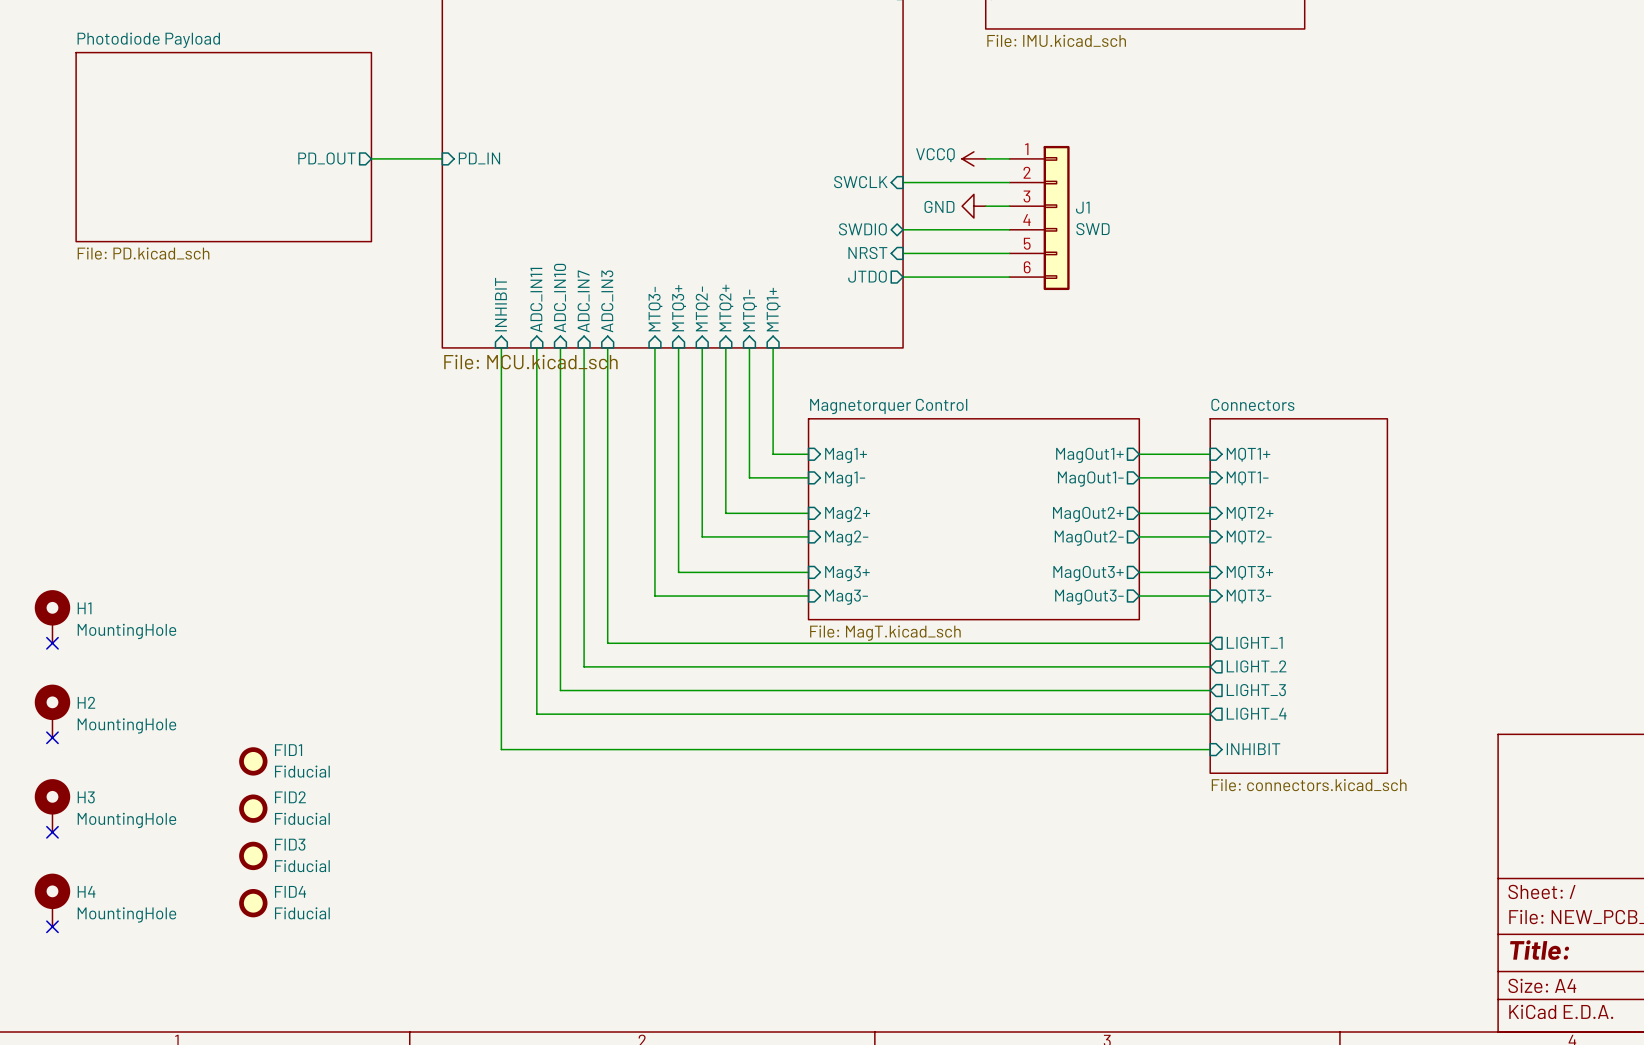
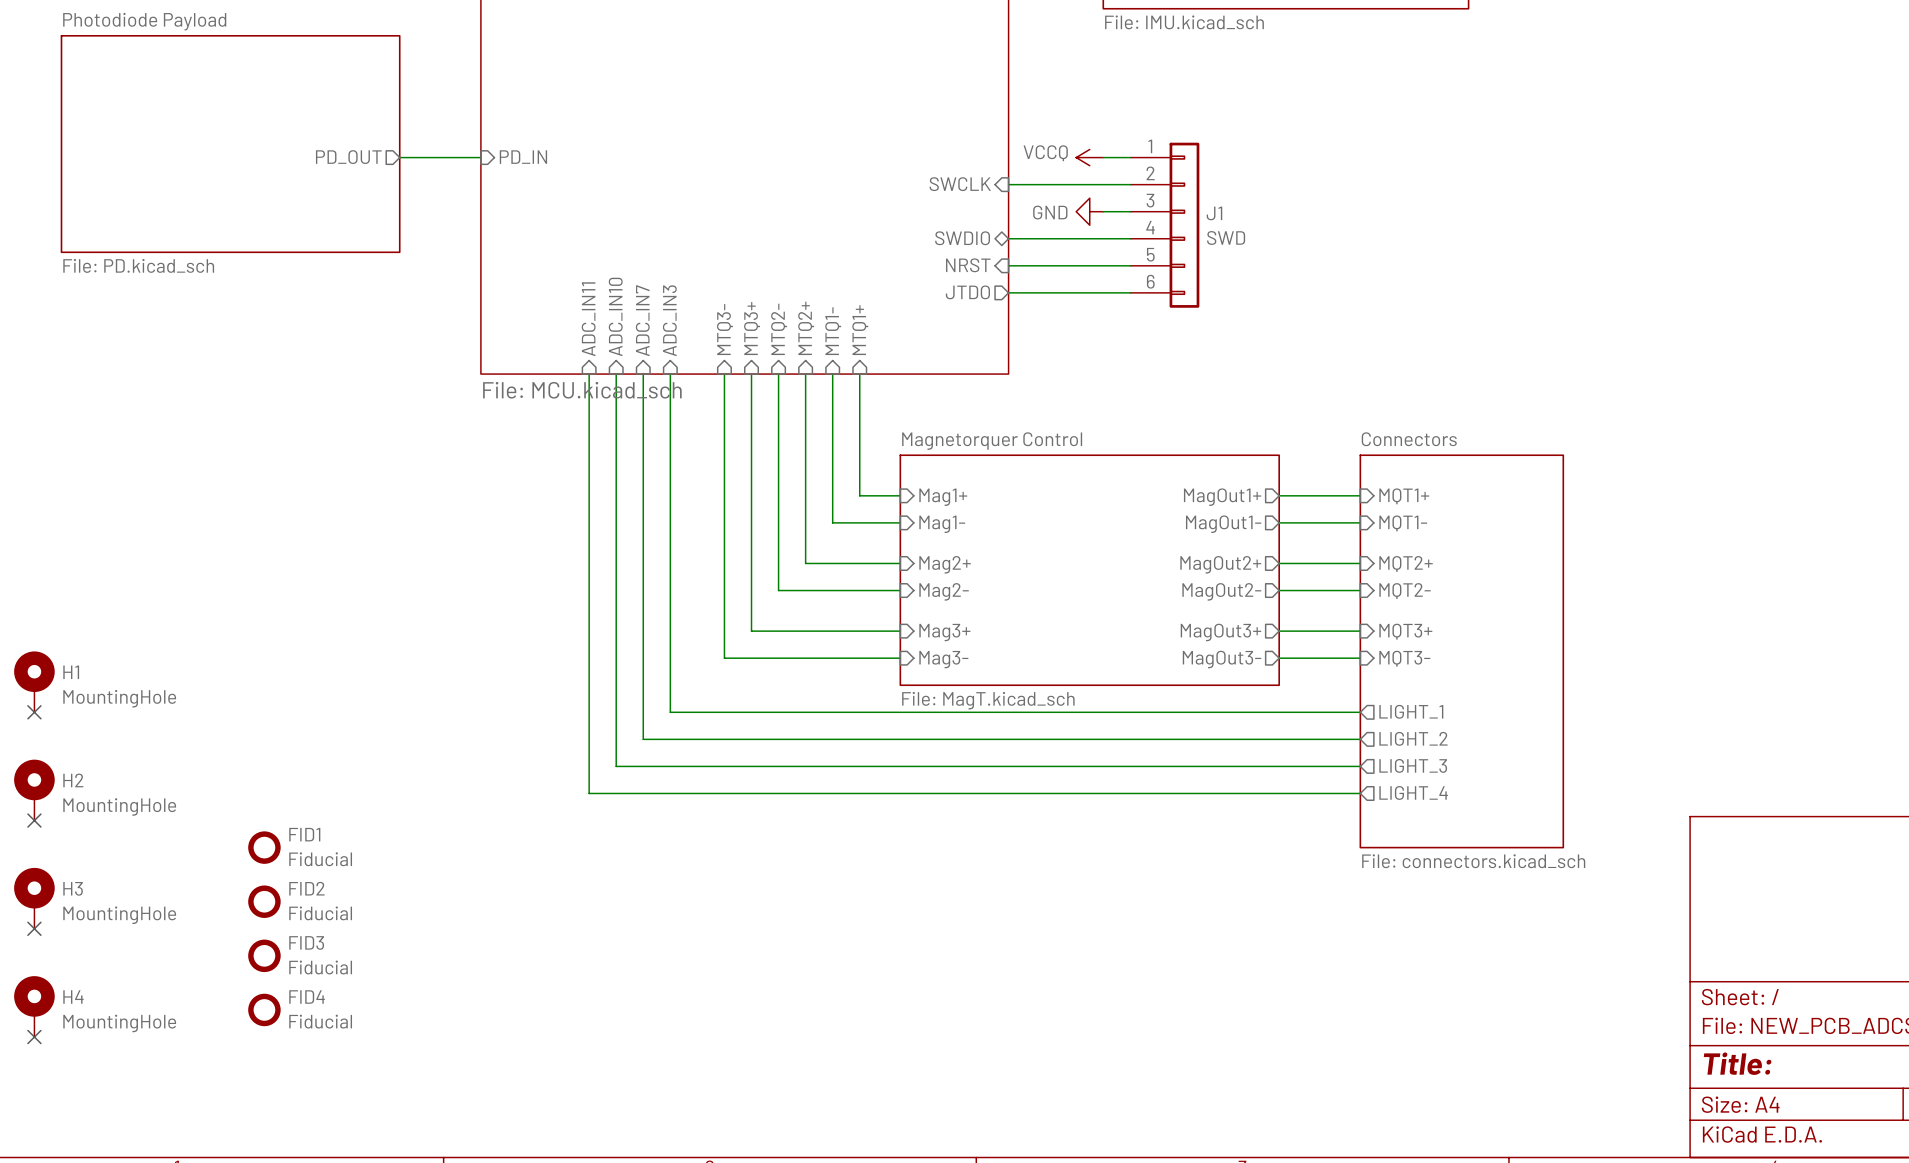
sheet pin: INHIBIT (500, 304) -> none
wire: (501, 347) (501, 749) (1210, 749) -> none
sheet Connectors shape: [1209, 418, 1389, 774] -> [1359, 454, 1565, 849]
sheet pin: INHIBIT (1253, 749) -> none

